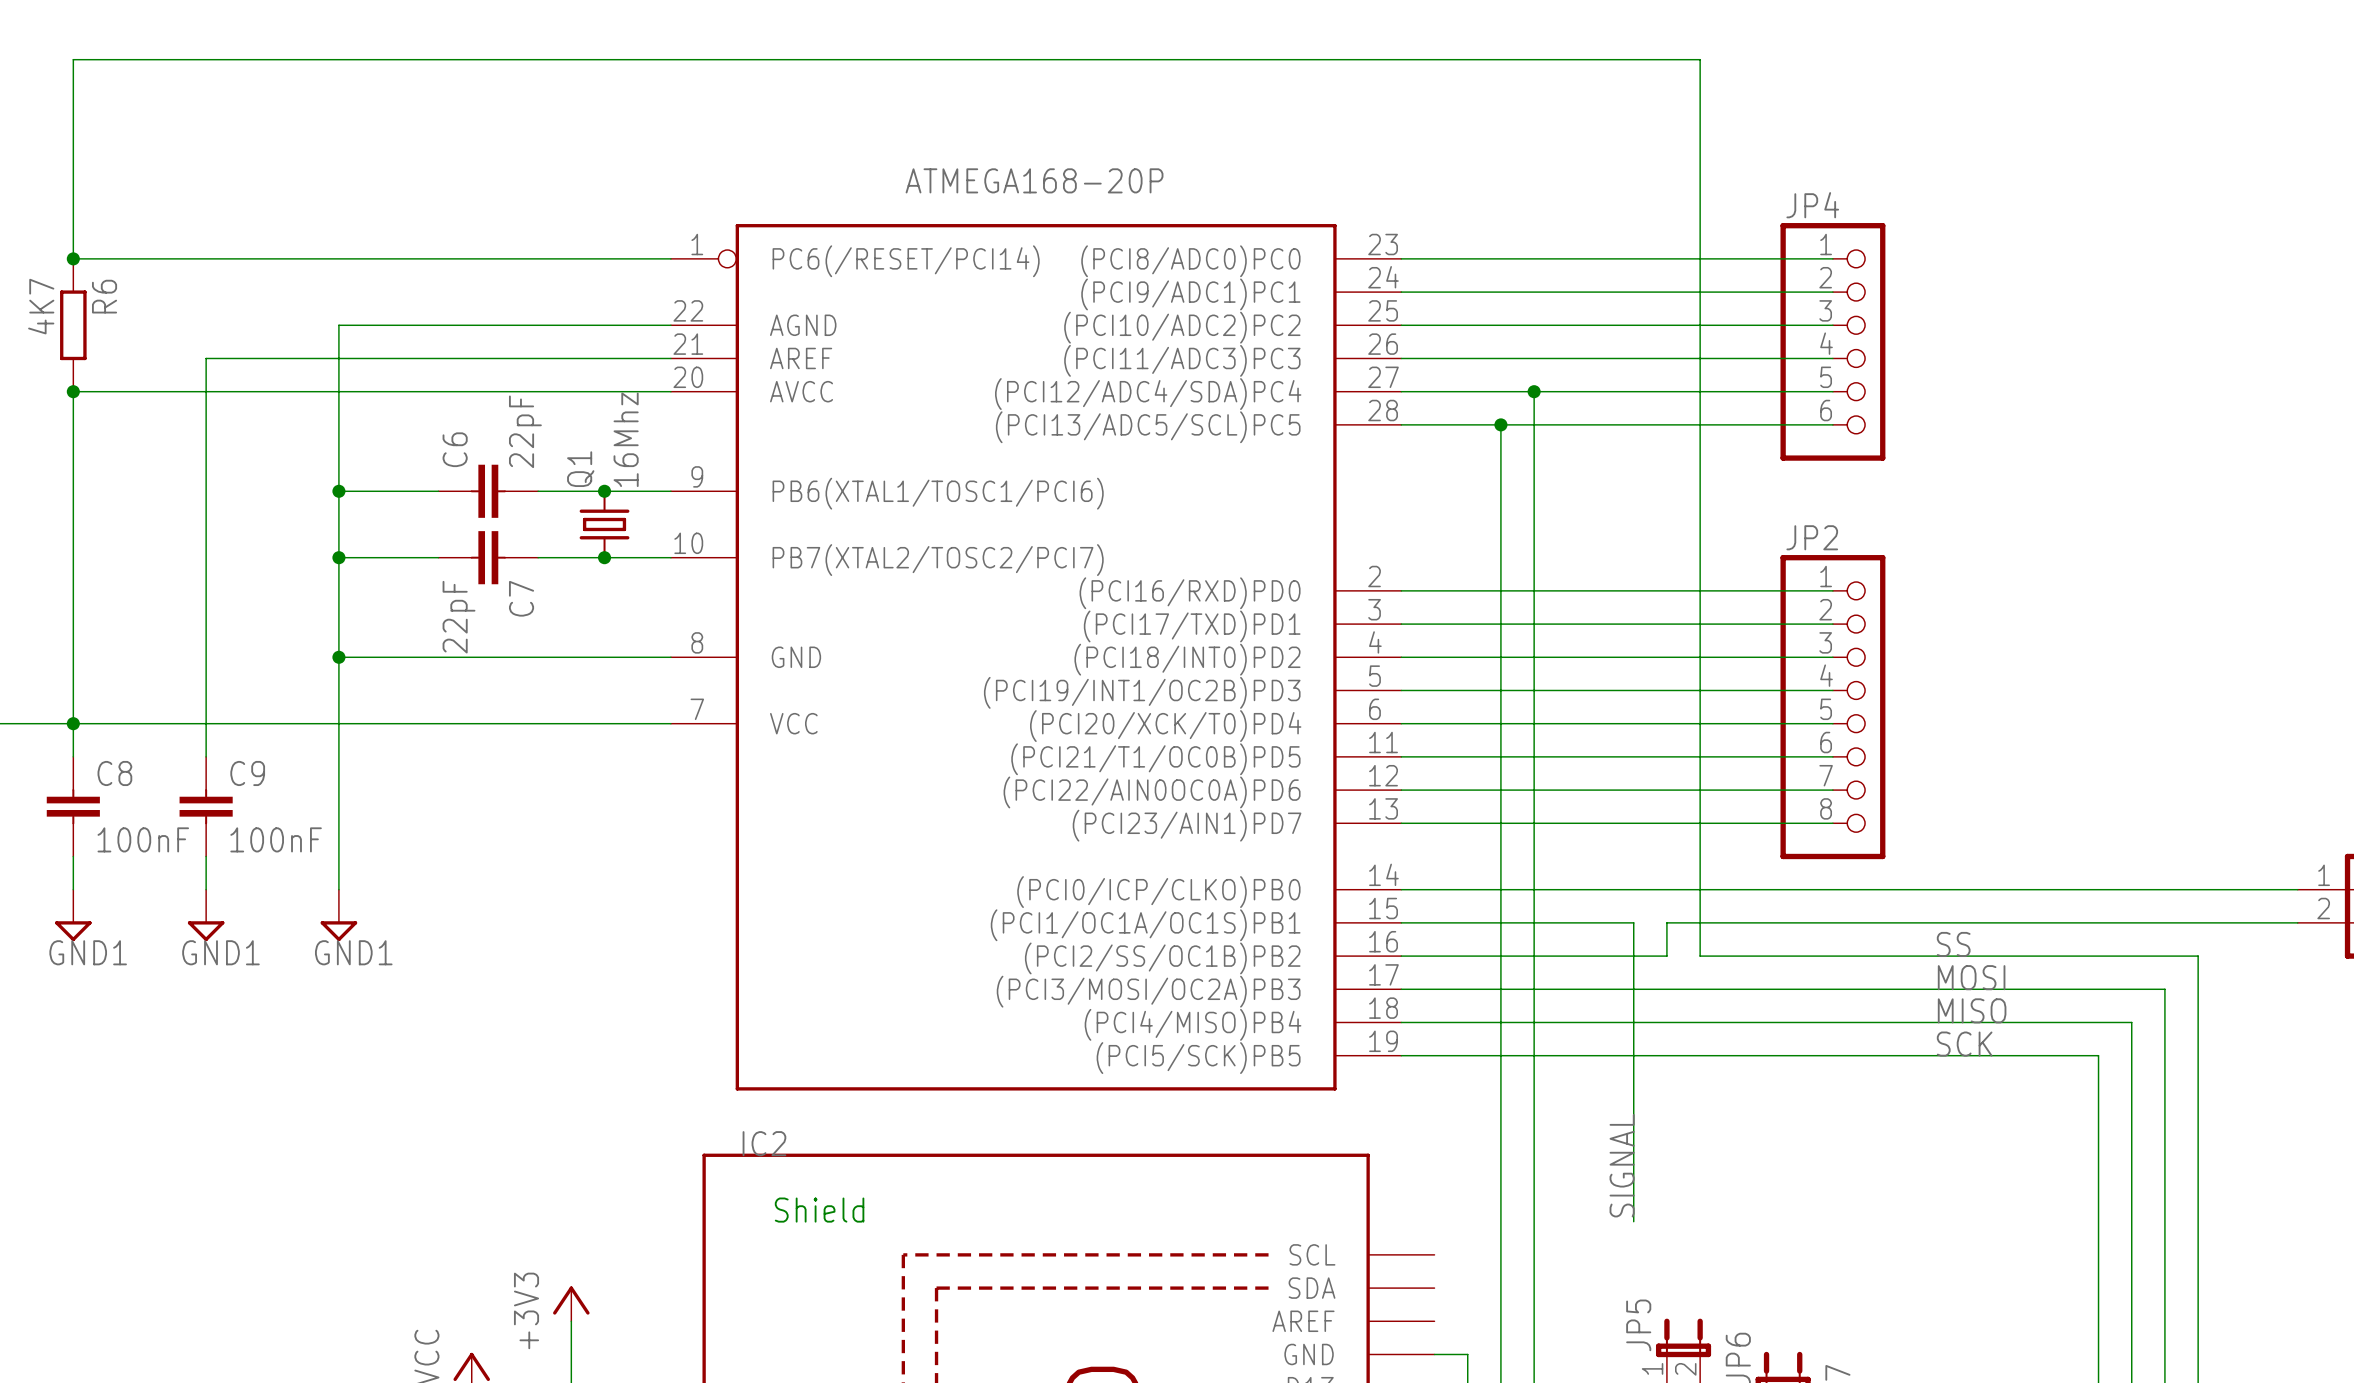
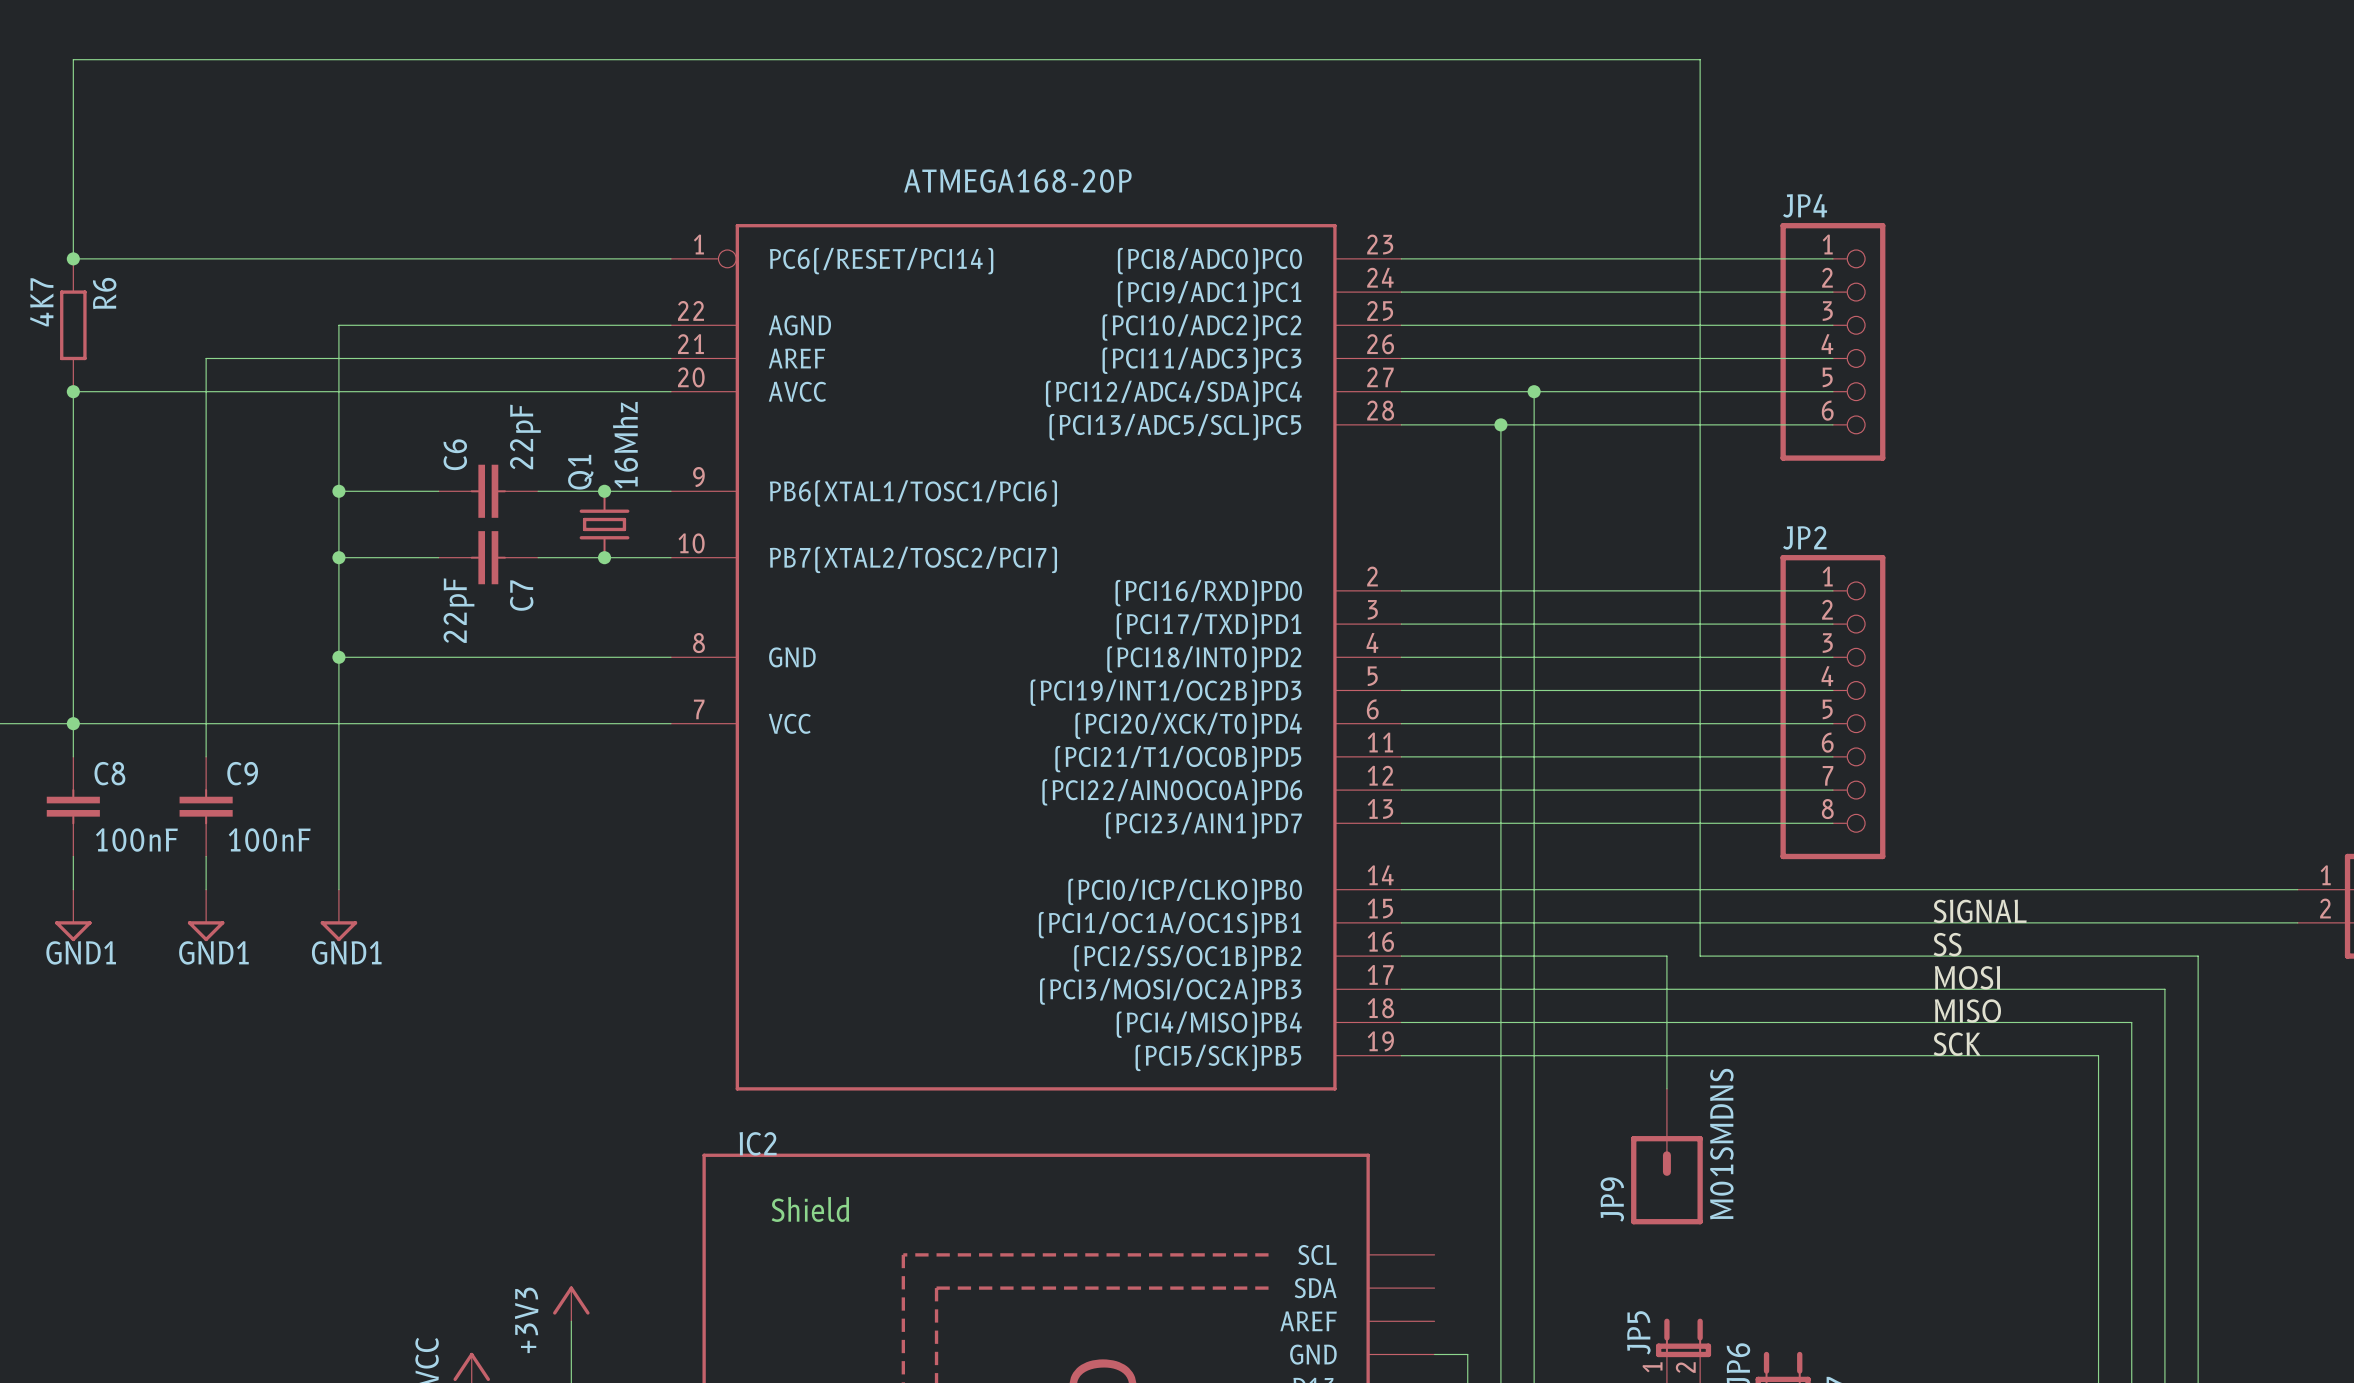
label: none -> SIGNAL (1980, 911)
wire: (1633, 922) (1633, 1221) -> none
wire: (1666, 922) (1666, 956) -> (1666, 922) (1633, 922)
wire: none -> (1666, 956) (1666, 1088)
JP9: none -> M01SMDNS (1666, 1156)
label: SIGNAL (1622, 1165) -> none

